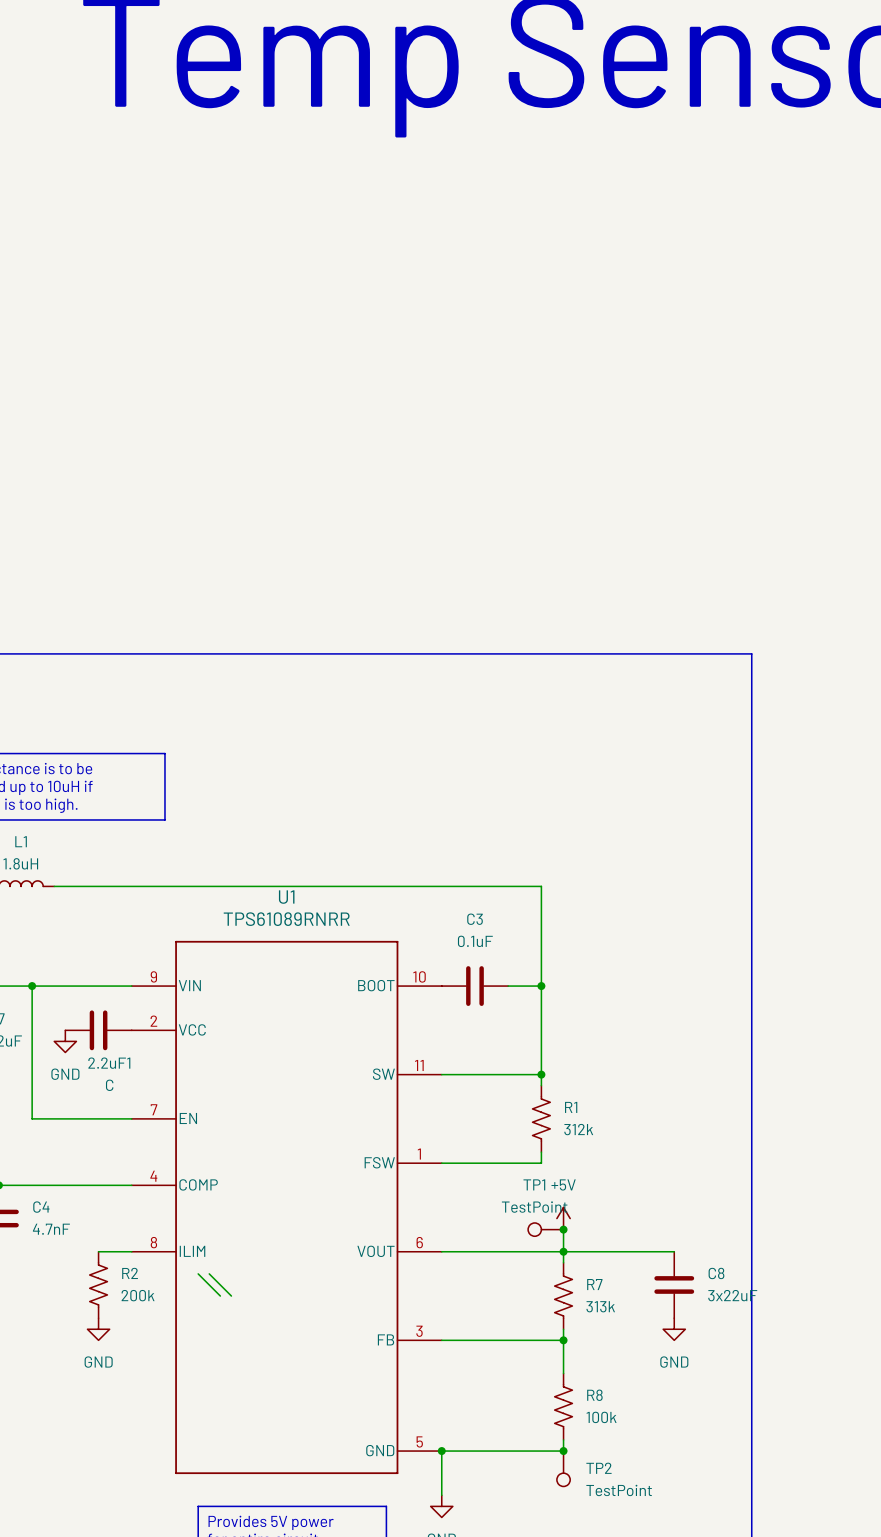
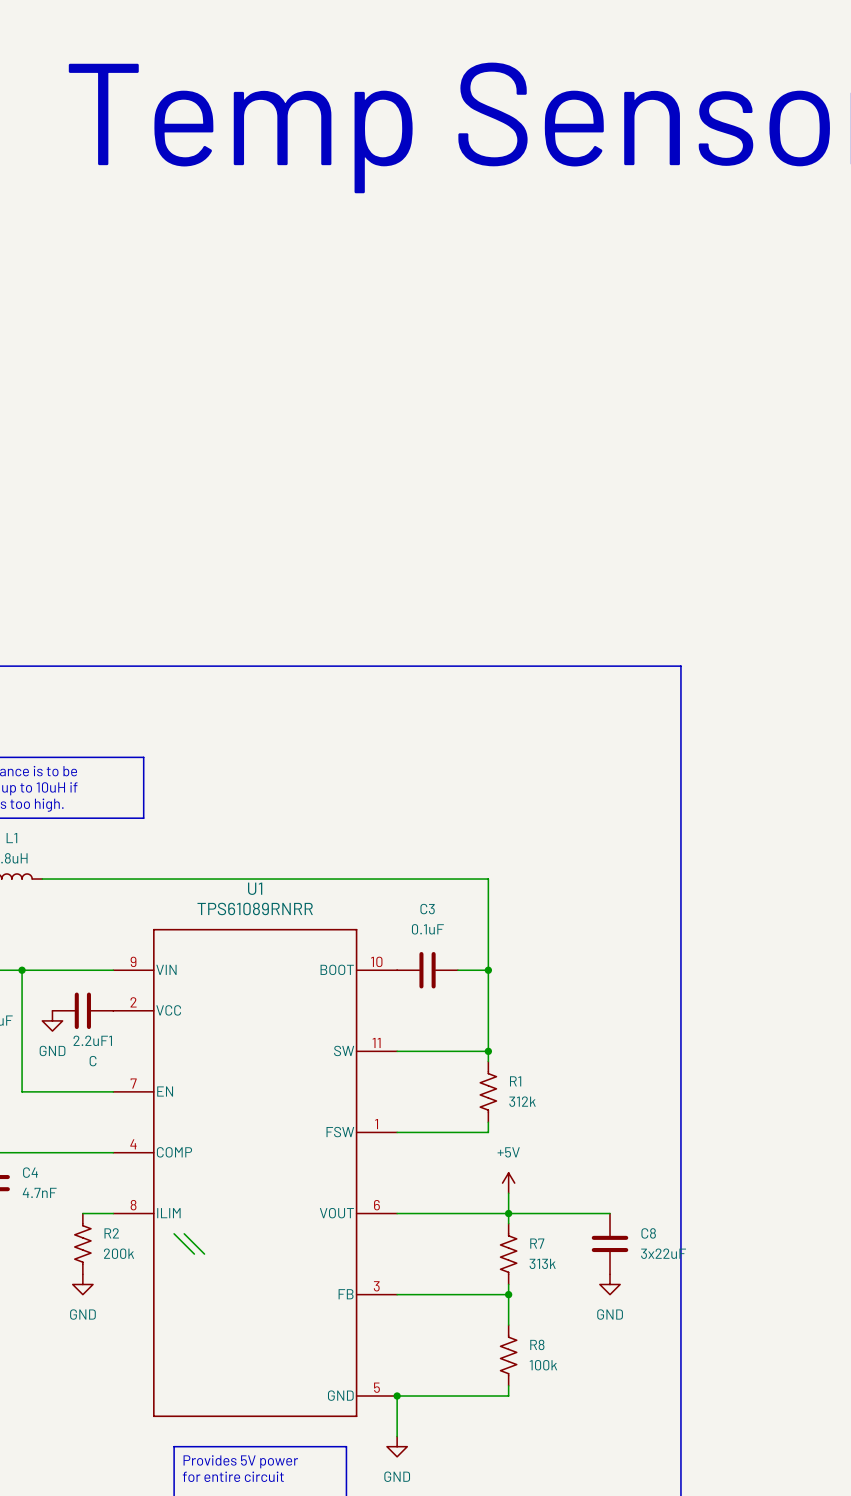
TP1: TestPoint (545, 1229) -> none
junction: (563, 1229) -> none
junction: (563, 1451) -> none
TP2: TestPoint (563, 1468) -> none

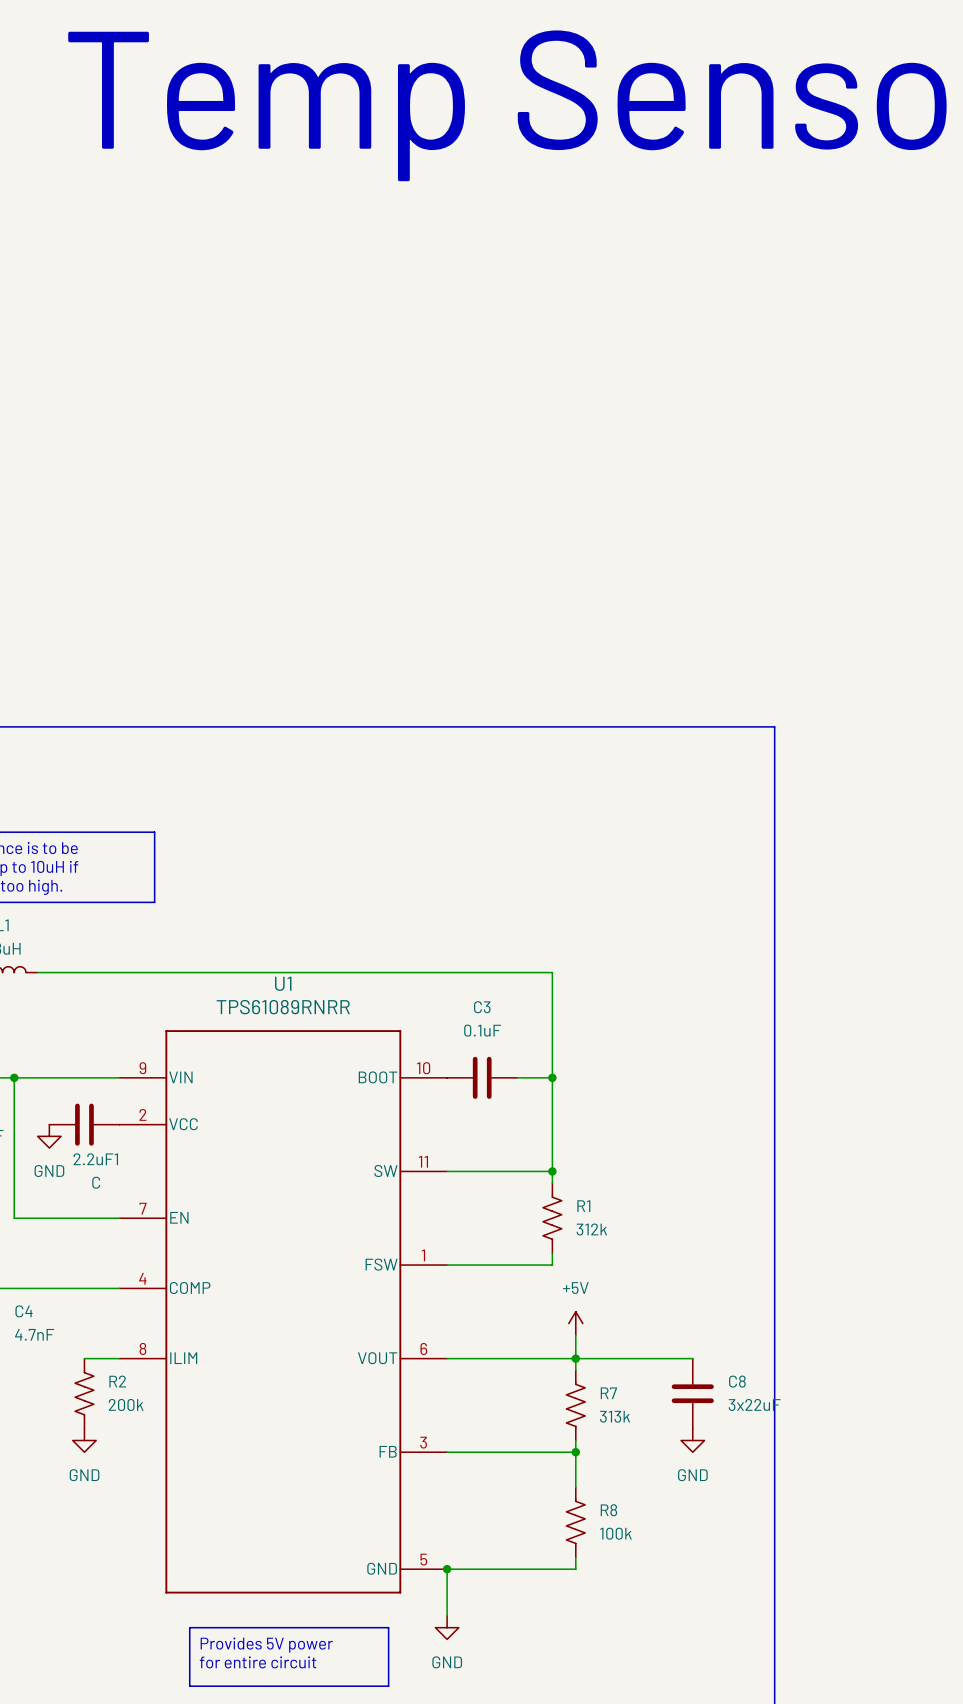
wire: (174, 1233) (194, 1254) -> none
wire: (184, 1233) (204, 1254) -> none

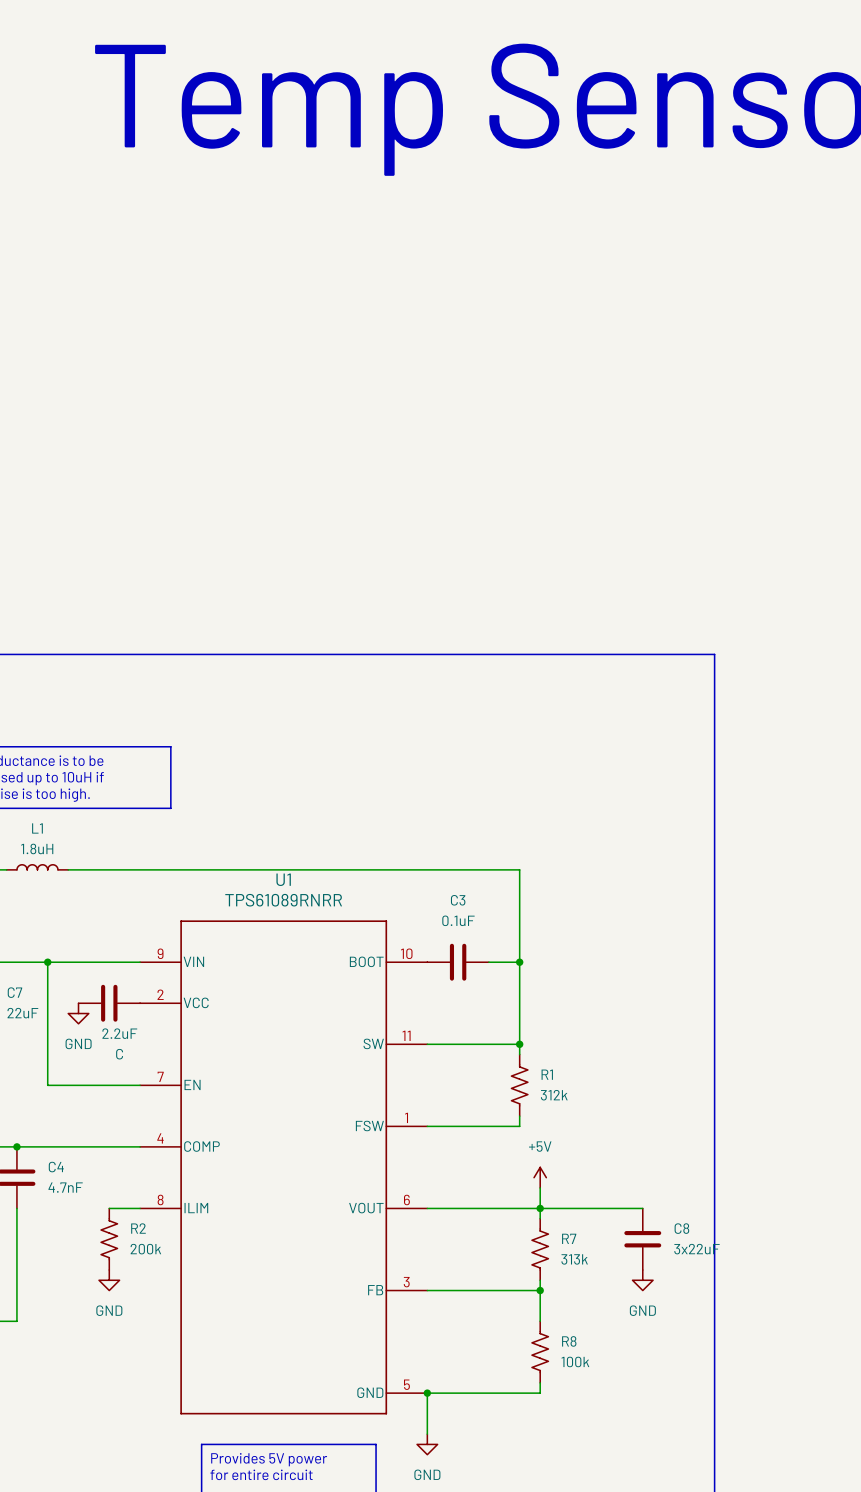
2.2uF1 name: 2.2uF1 (95, 1159) -> 2.2uF (119, 1033)

